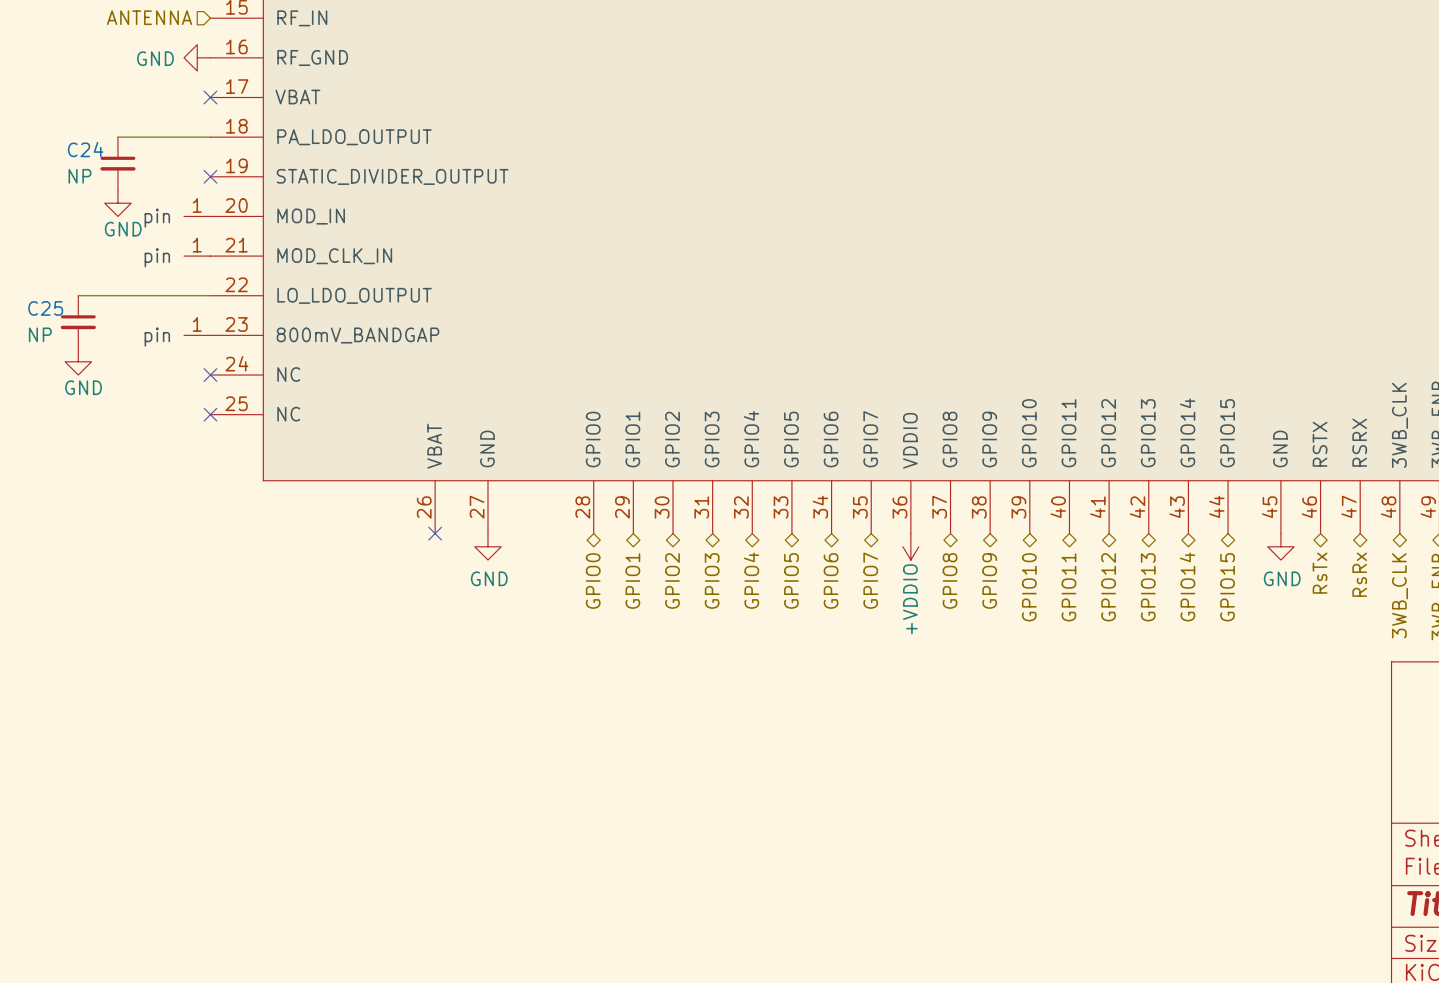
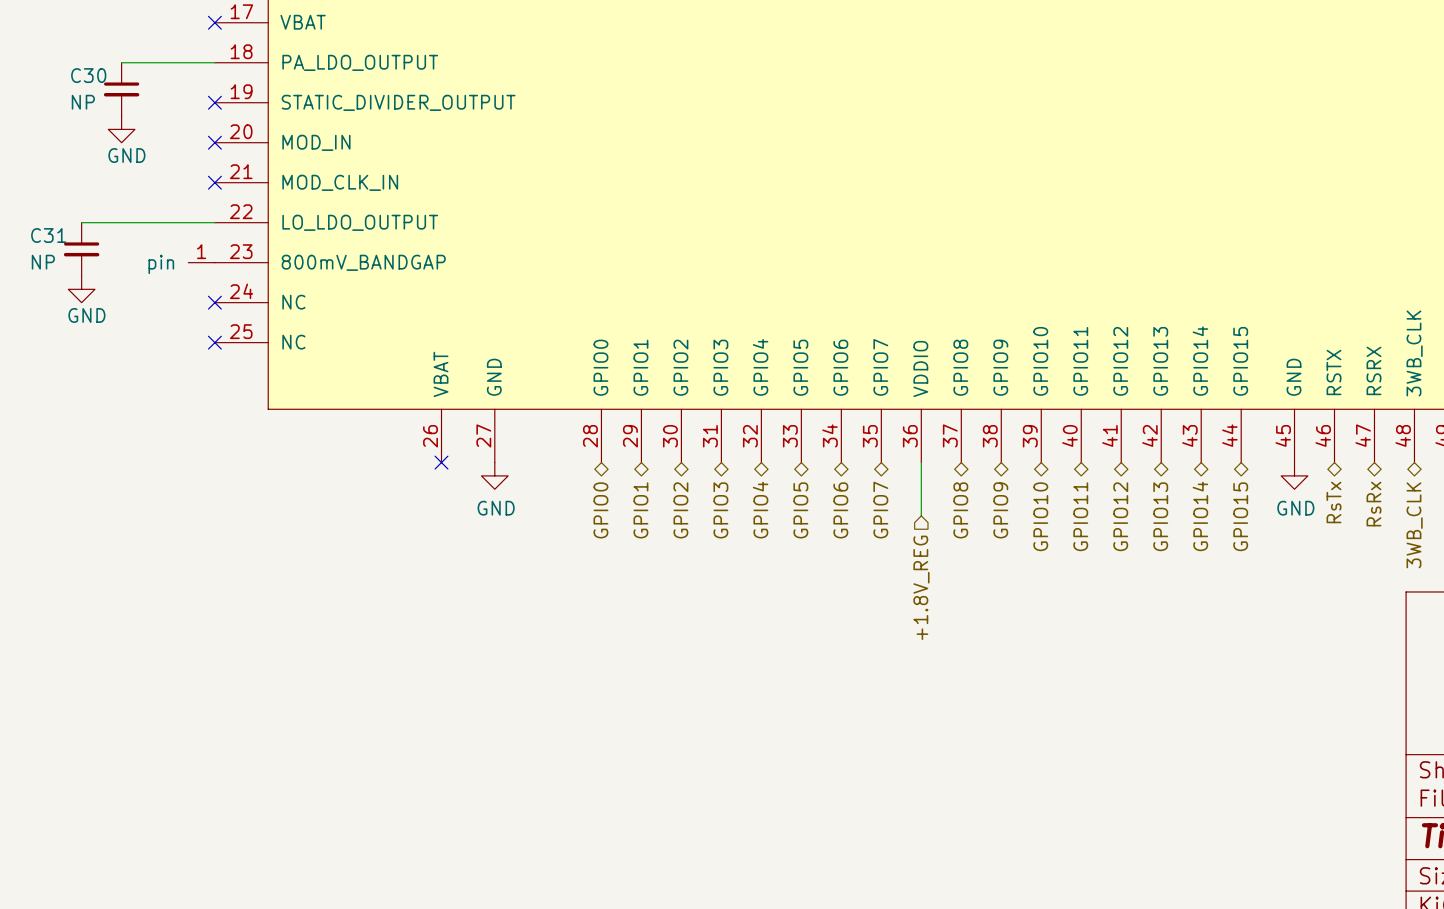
C24 name: C24 (85, 149) -> C30 (88, 75)
part: (197, 216) -> none
no-connect mark: none -> (214, 142)
part: (197, 256) -> none
no-connect mark: none -> (214, 182)
C25 name: C25 (45, 308) -> C31 (48, 235)
power symbol: +VDDIO (910, 546) -> none
hierarchical label: none -> +1.8V_REG (921, 587)

